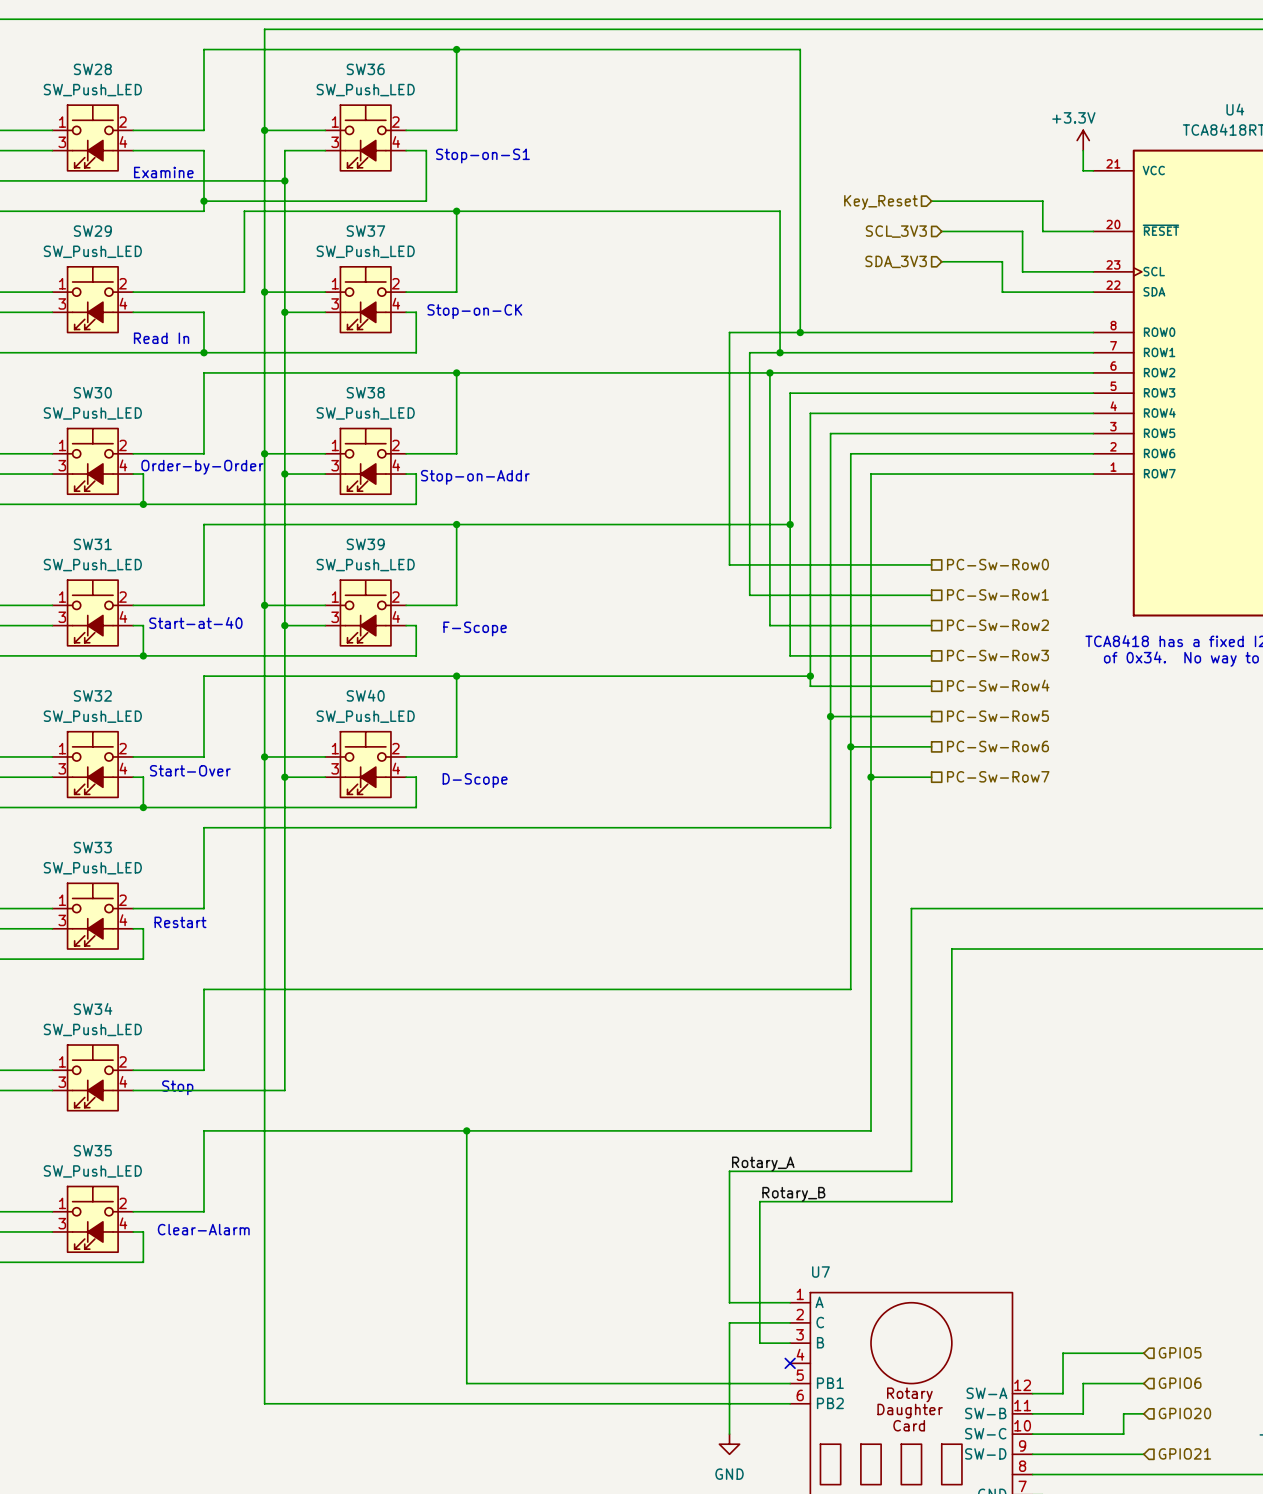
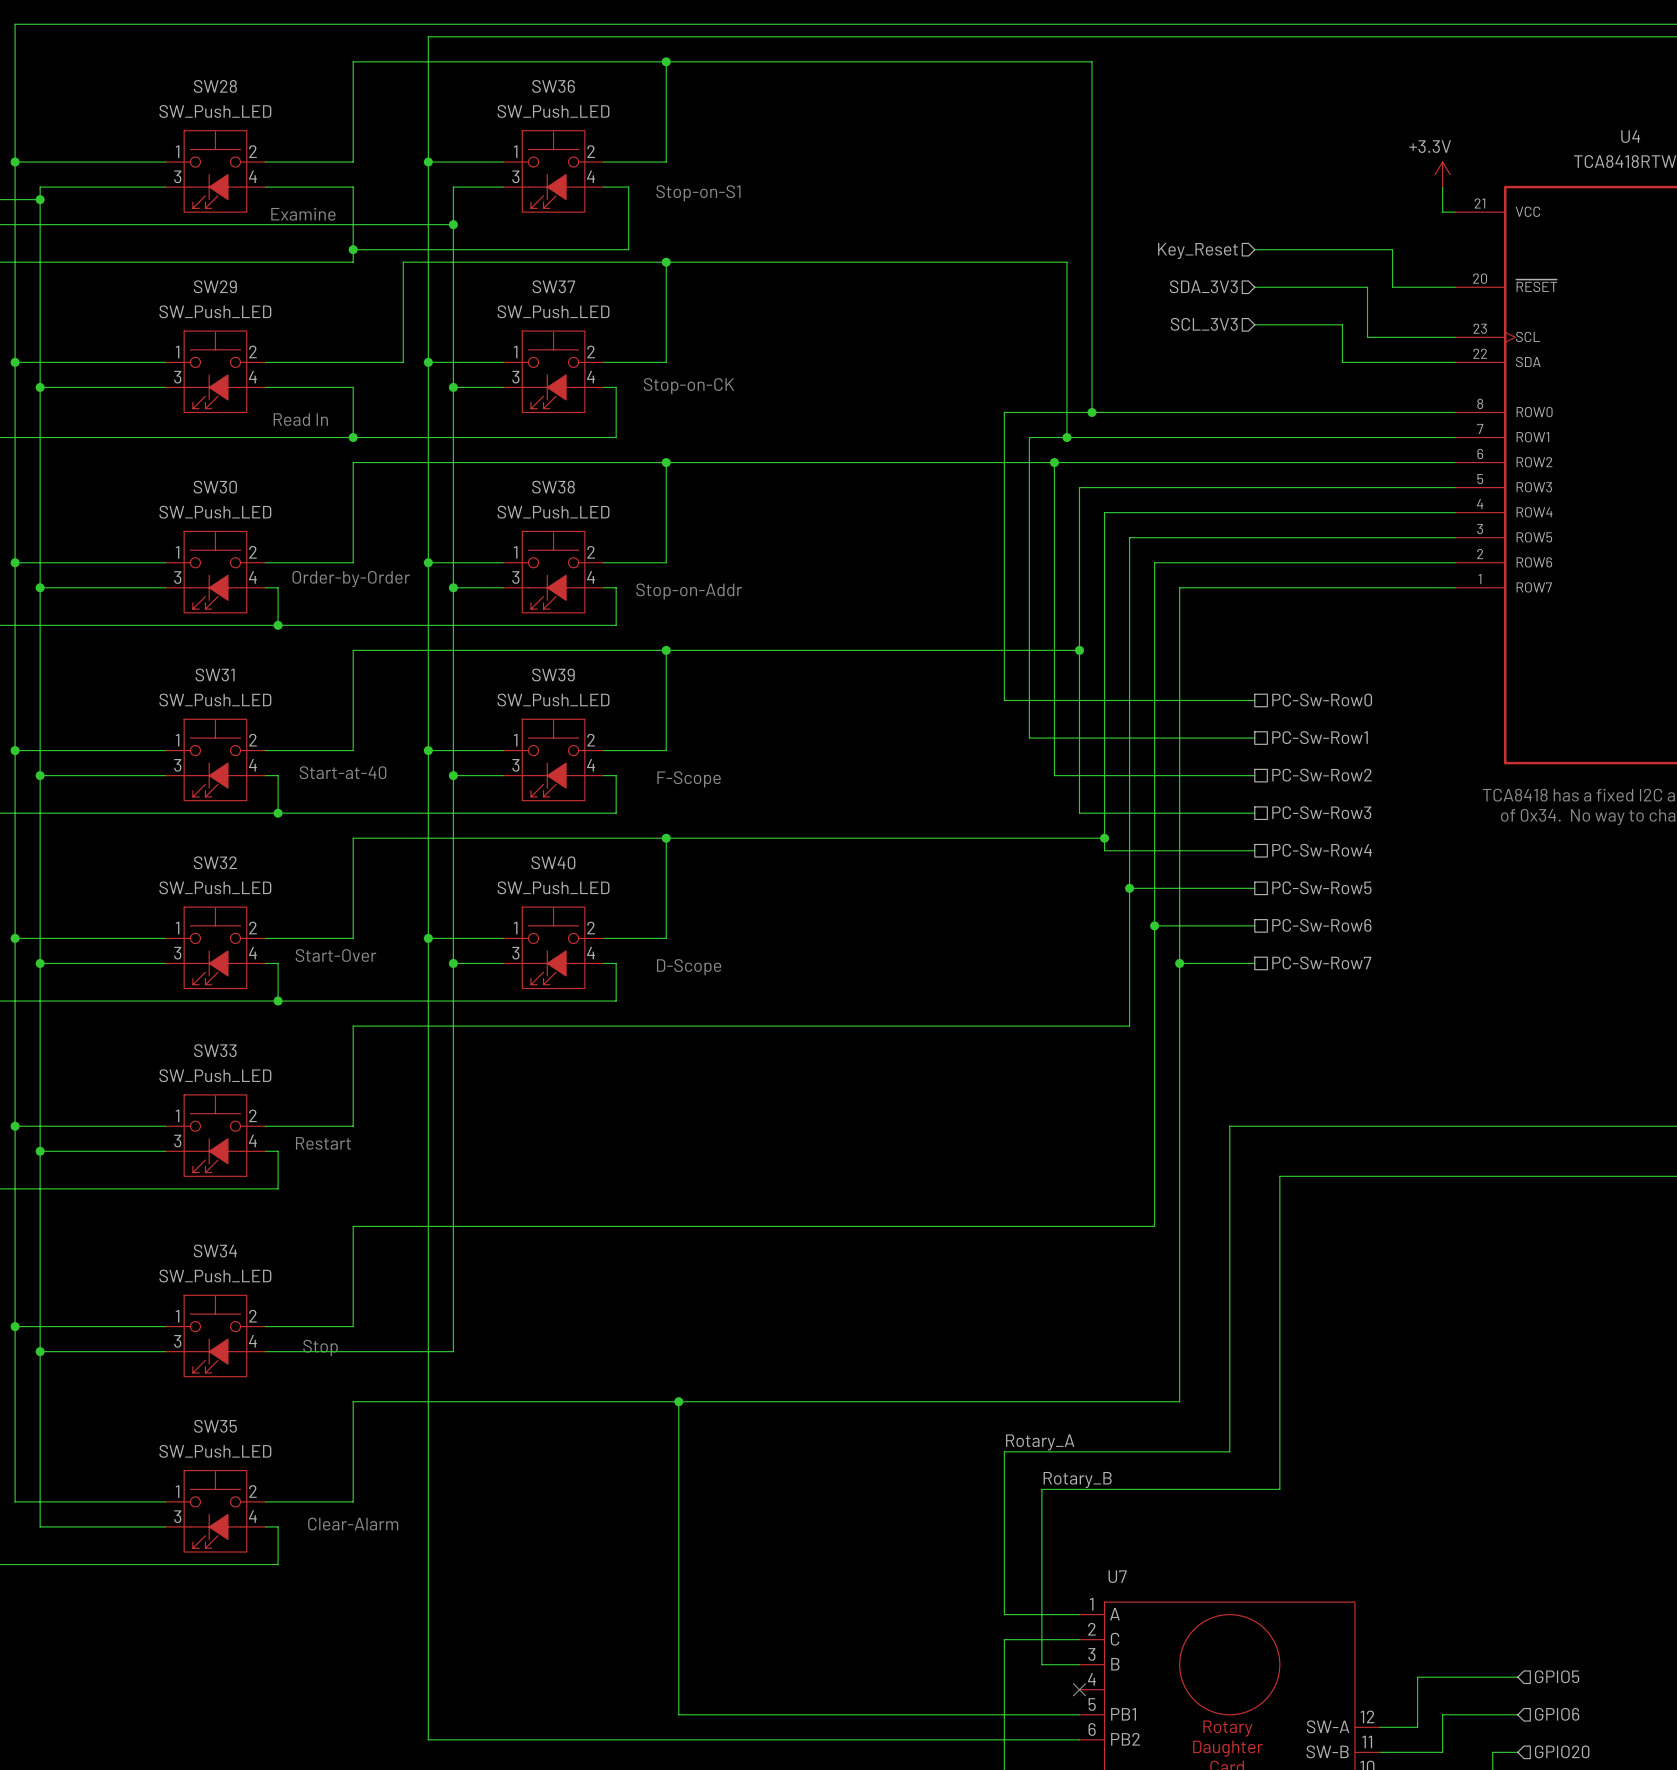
hierarchical label position: SCL_3V3 (896, 231) -> SCL_3V3 (1204, 324)
wire: none -> (1254, 287) (1267, 287)
hierarchical label position: SDA_3V3 (896, 261) -> SDA_3V3 (1203, 286)
wire: none -> (1254, 324) (1267, 324)

